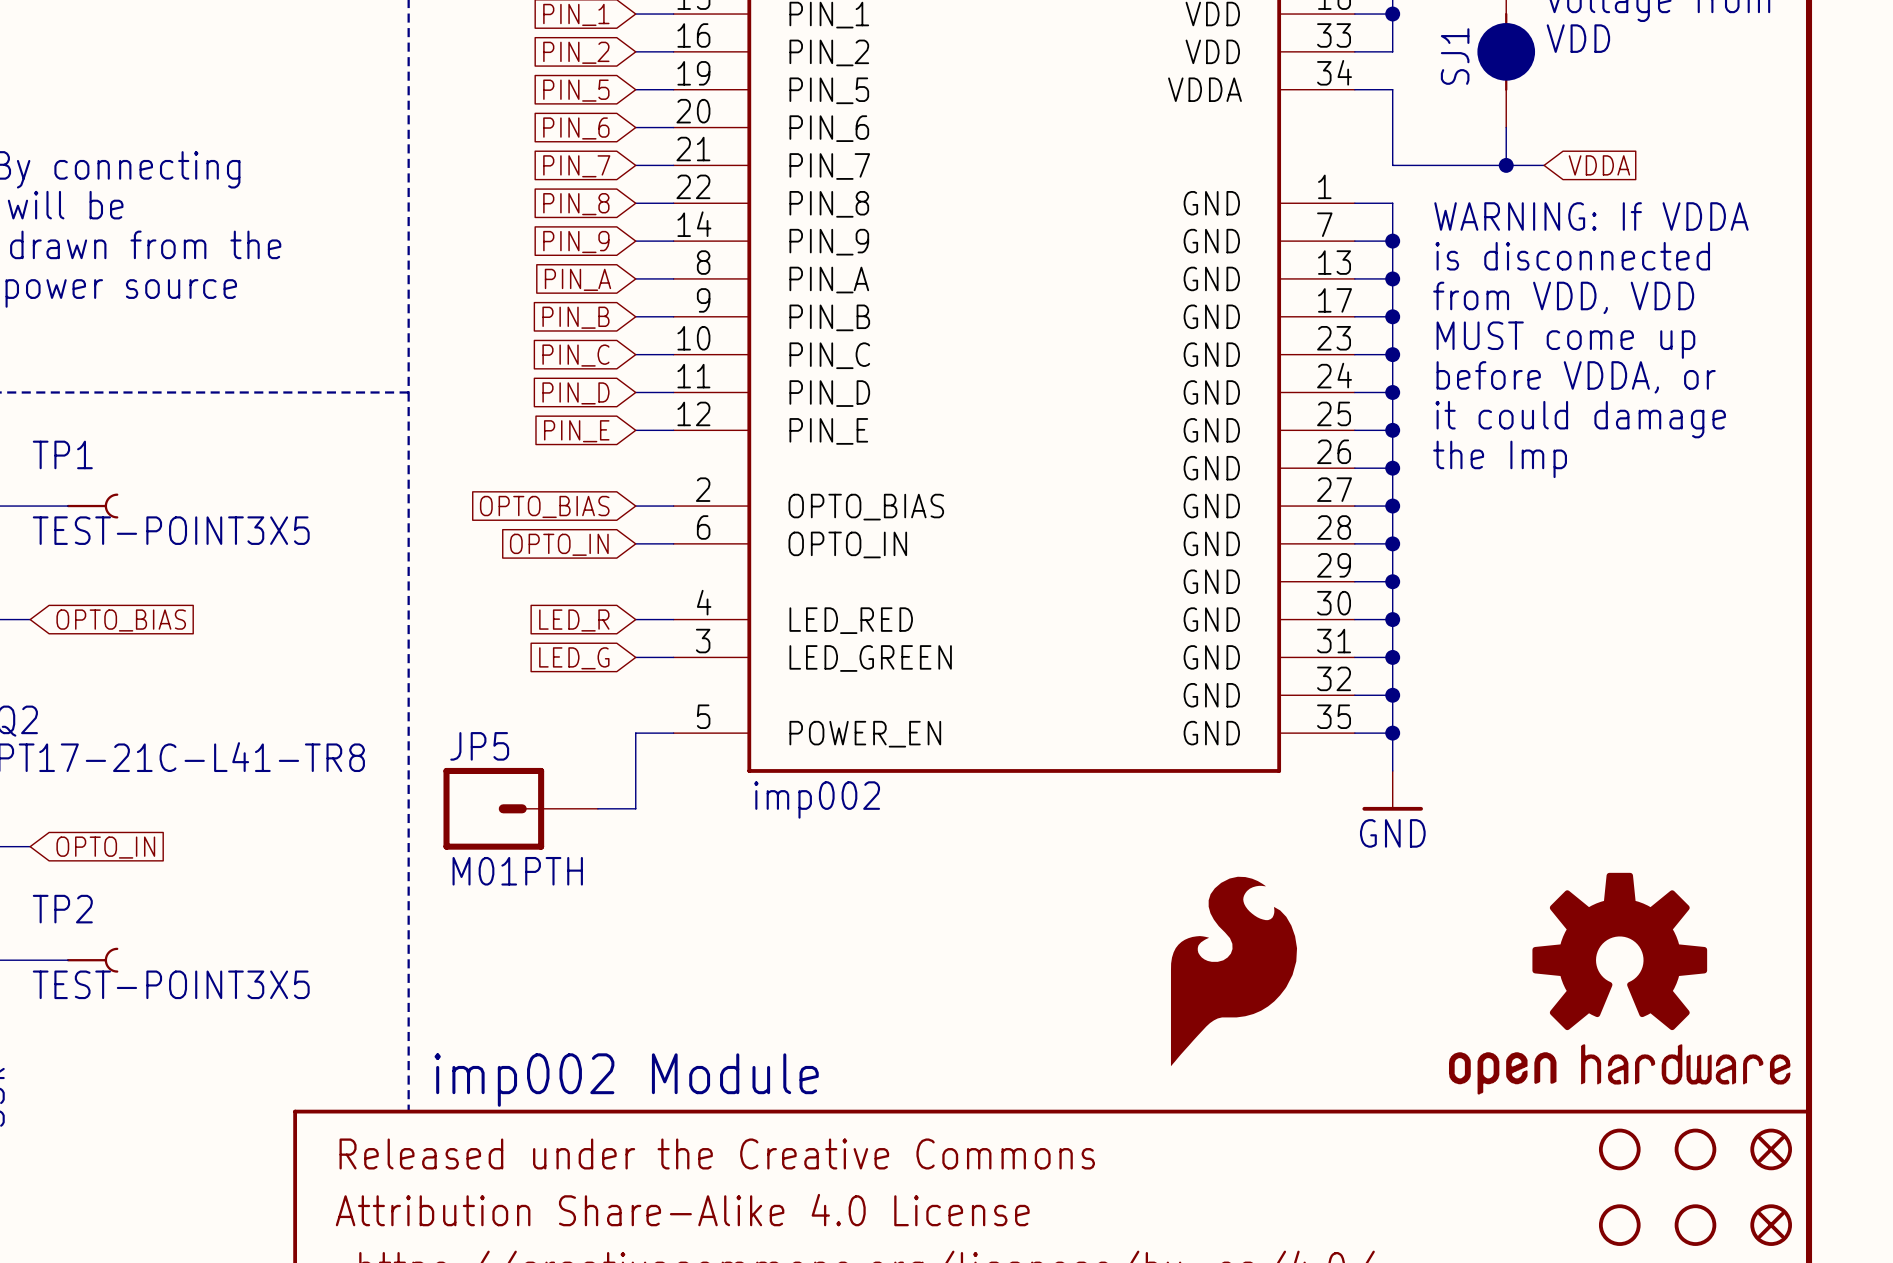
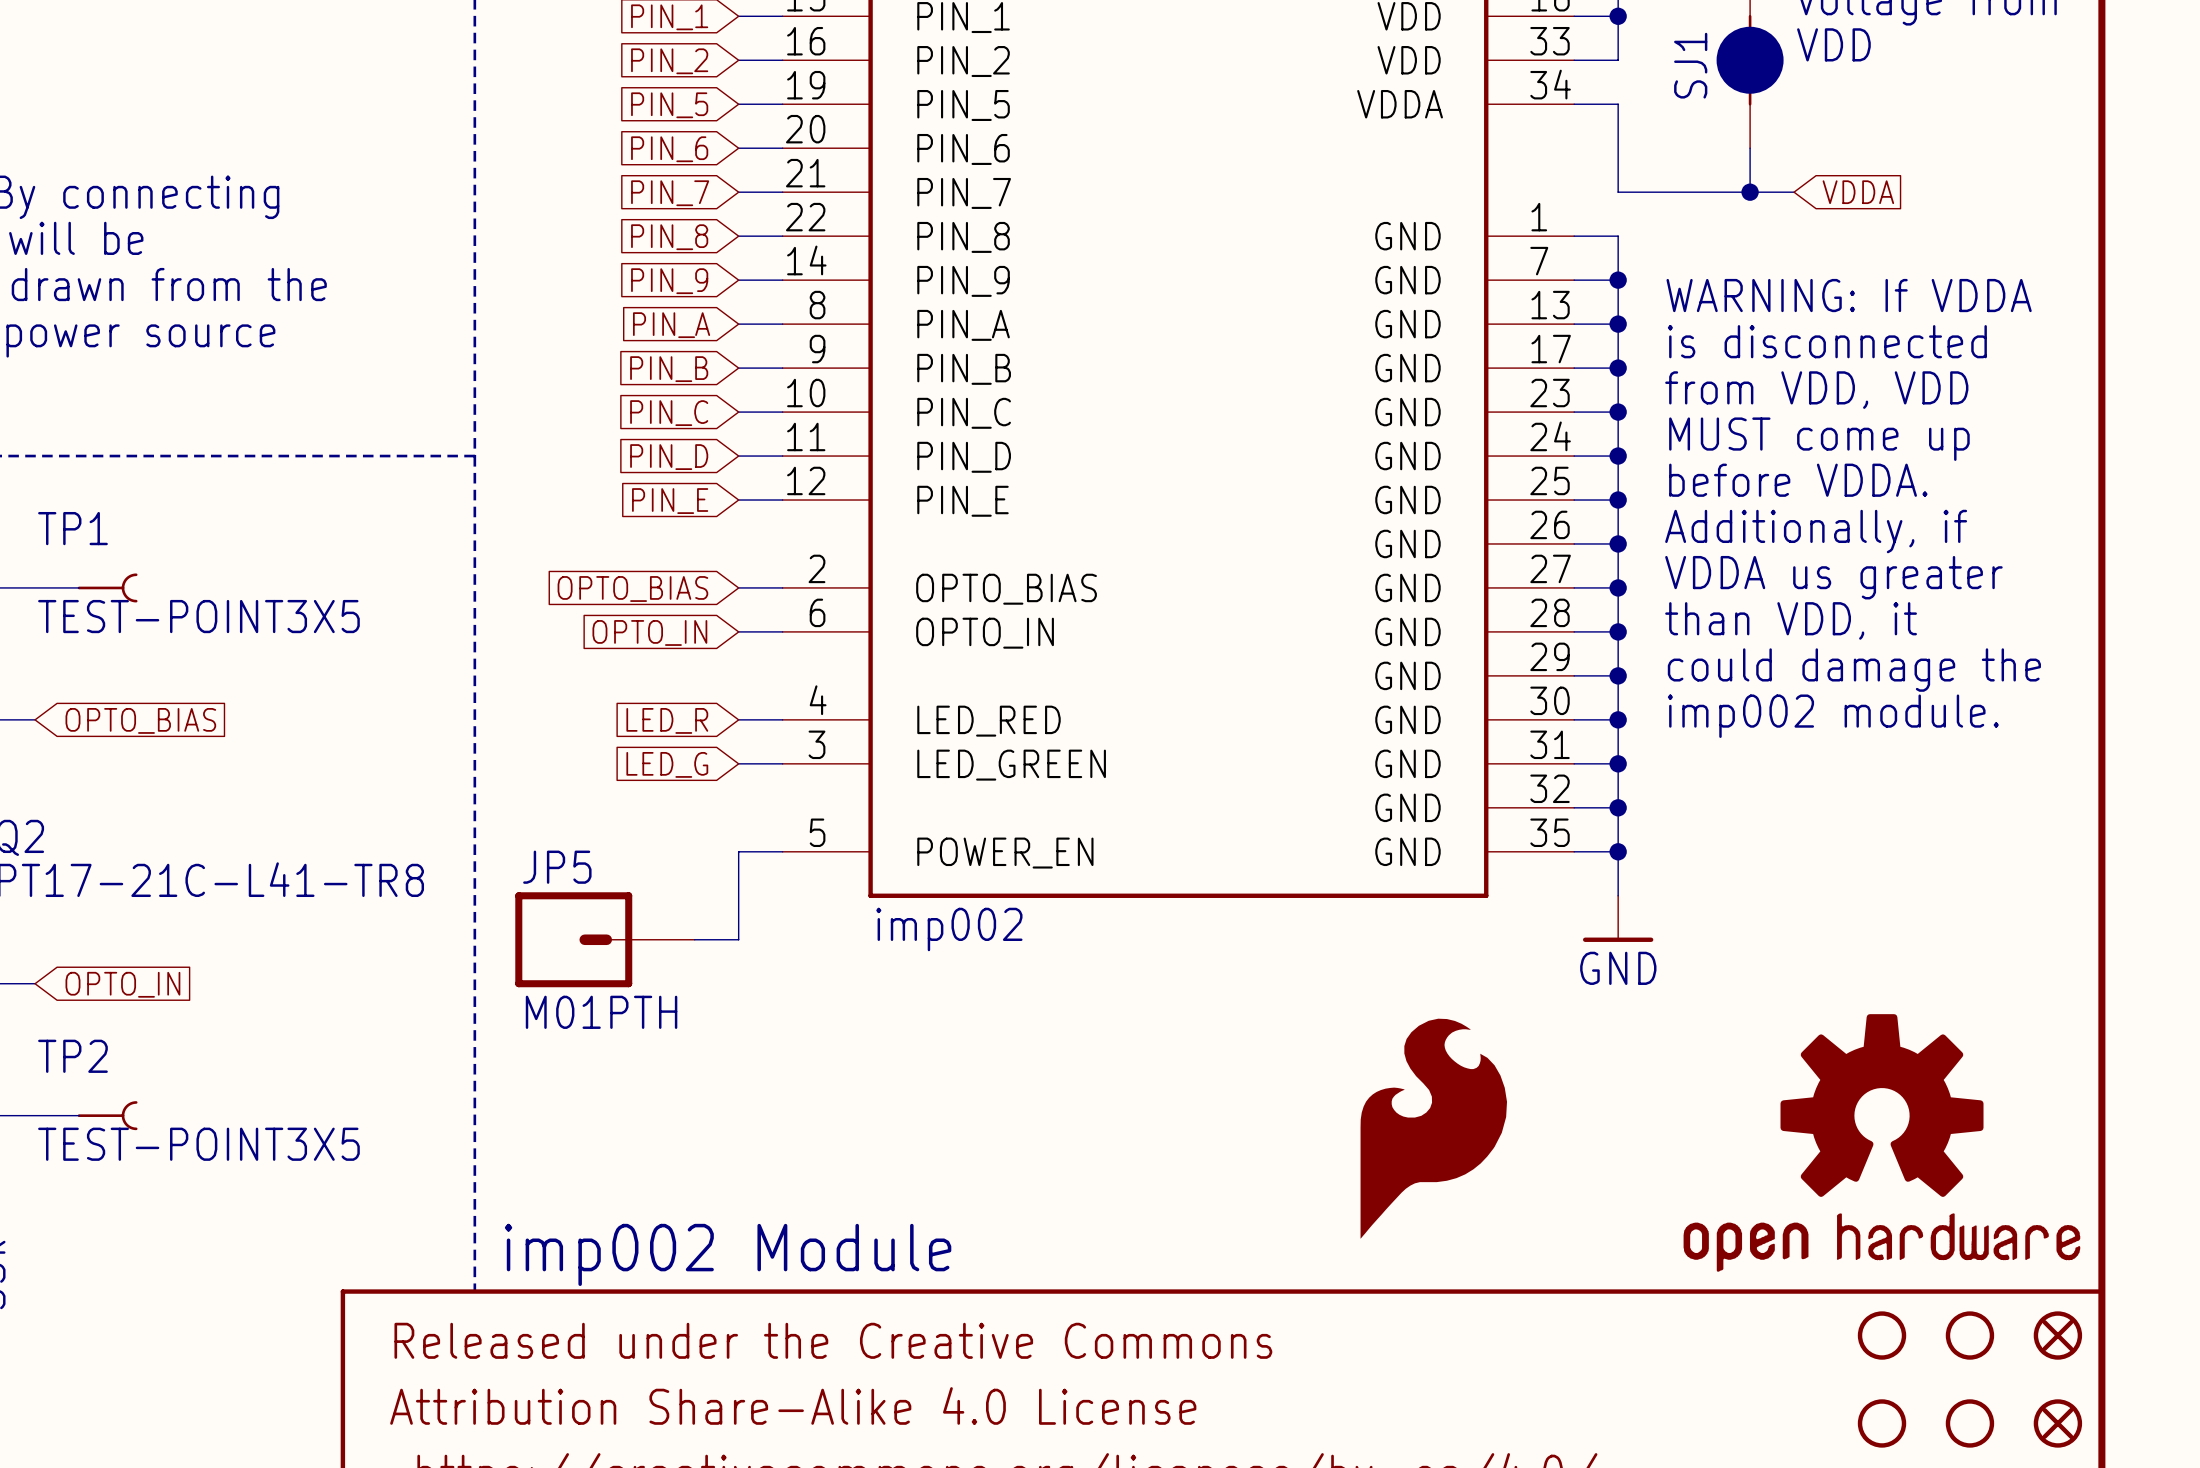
text position: WARNING: If VDDA (1591, 216) -> WARNING: If VDDA (1849, 295)
text position: is disconnected (1572, 256) -> is disconnected (1827, 341)
text position: from VDD, VDD (1563, 297) -> from VDD, VDD (1816, 390)
text position: MUST come up (1565, 340) -> MUST come up (1819, 439)
text: before VDDA, or (1576, 377) -> before VDDA. (1798, 480)
text: it could damage (1580, 419) -> Additionally, if (1816, 531)
text: the Imp (1500, 459) -> VDDA us greater (1833, 577)
text: none -> than VDD, it (1791, 620)
text: none -> could damage the (1854, 670)
text: none -> imp002 module. (1833, 716)

